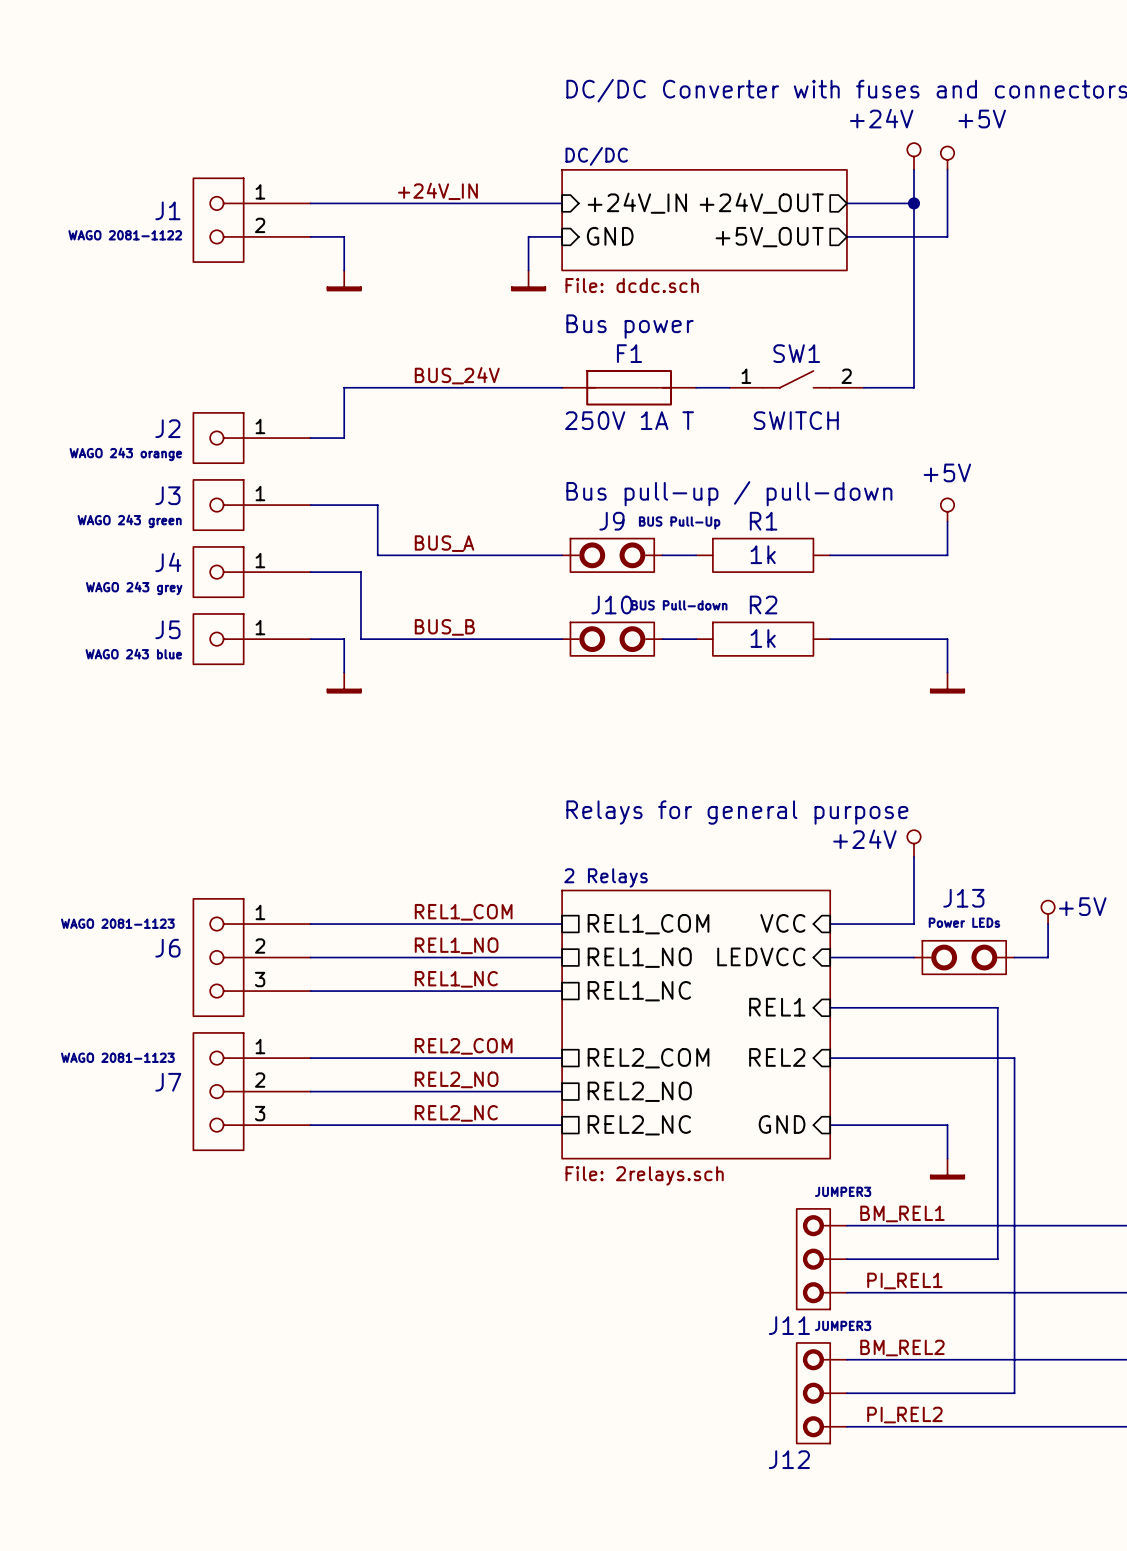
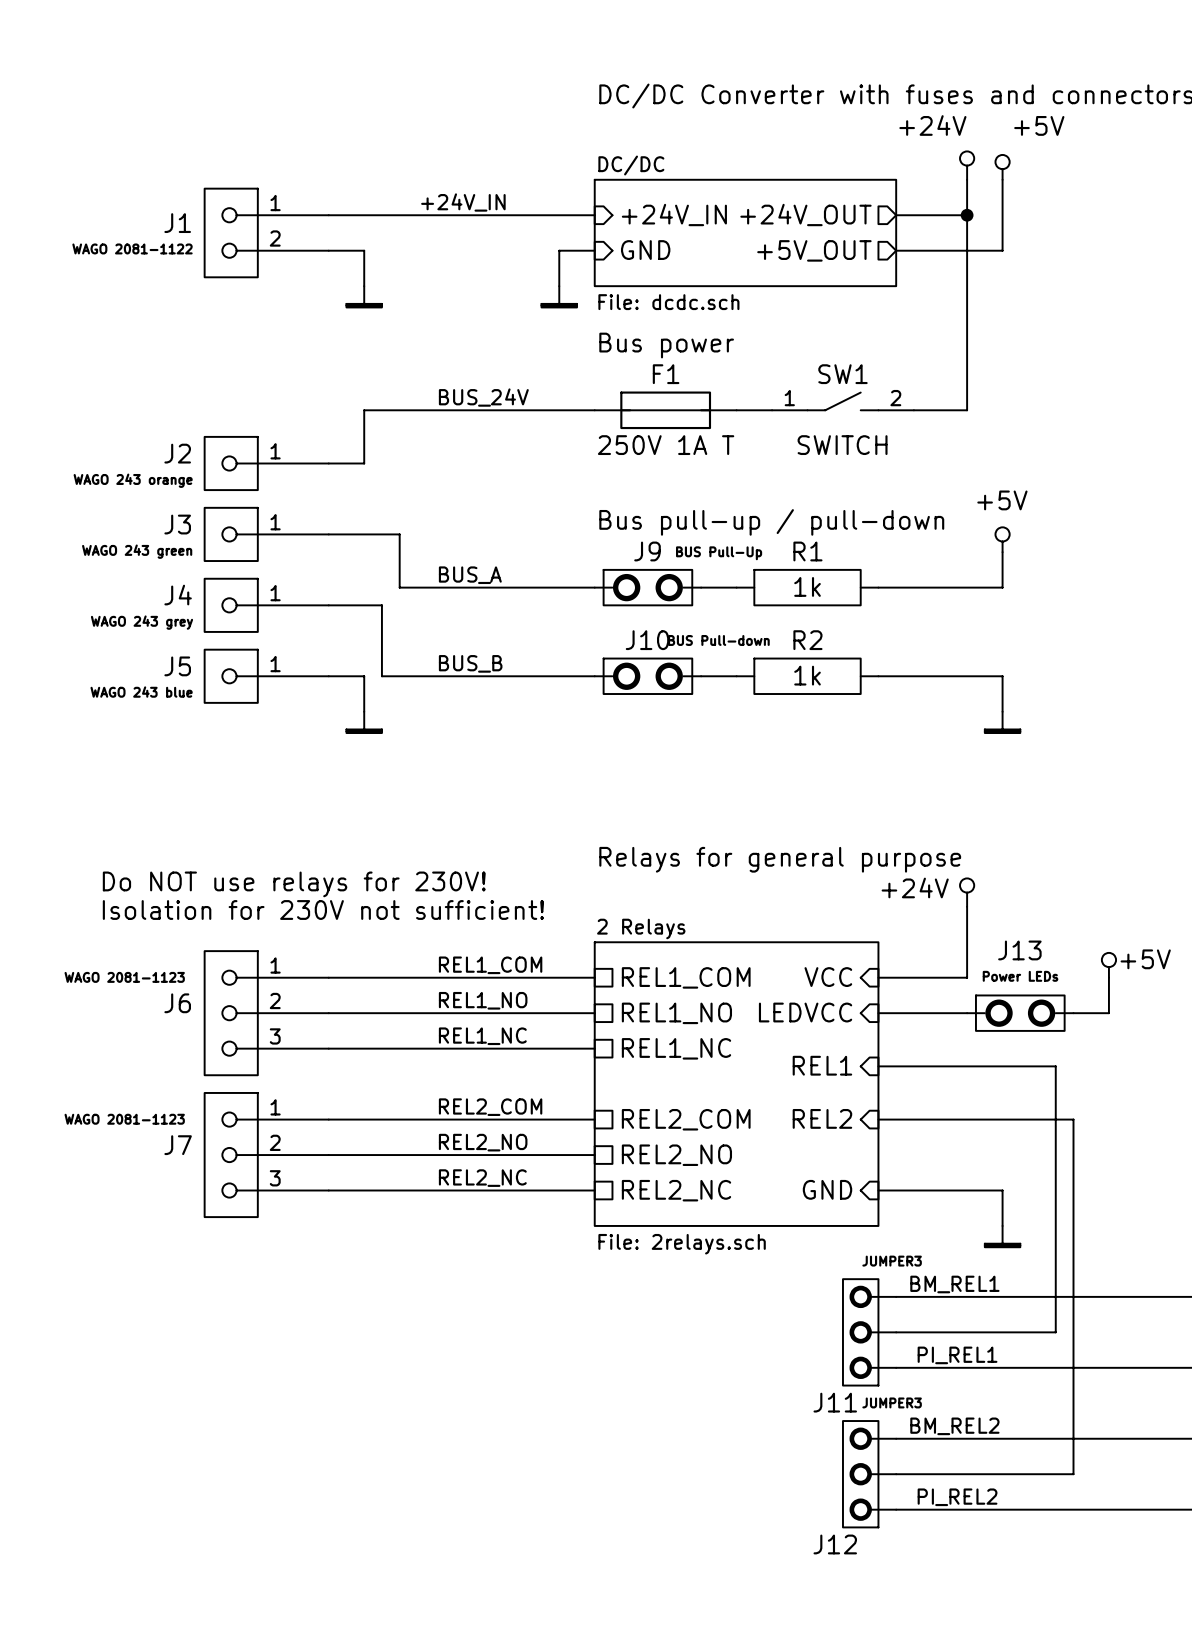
text: none -> Do NOT use relays for 230V! (294, 884)
text: none -> Isolation for 230V not sufficient! (323, 909)

